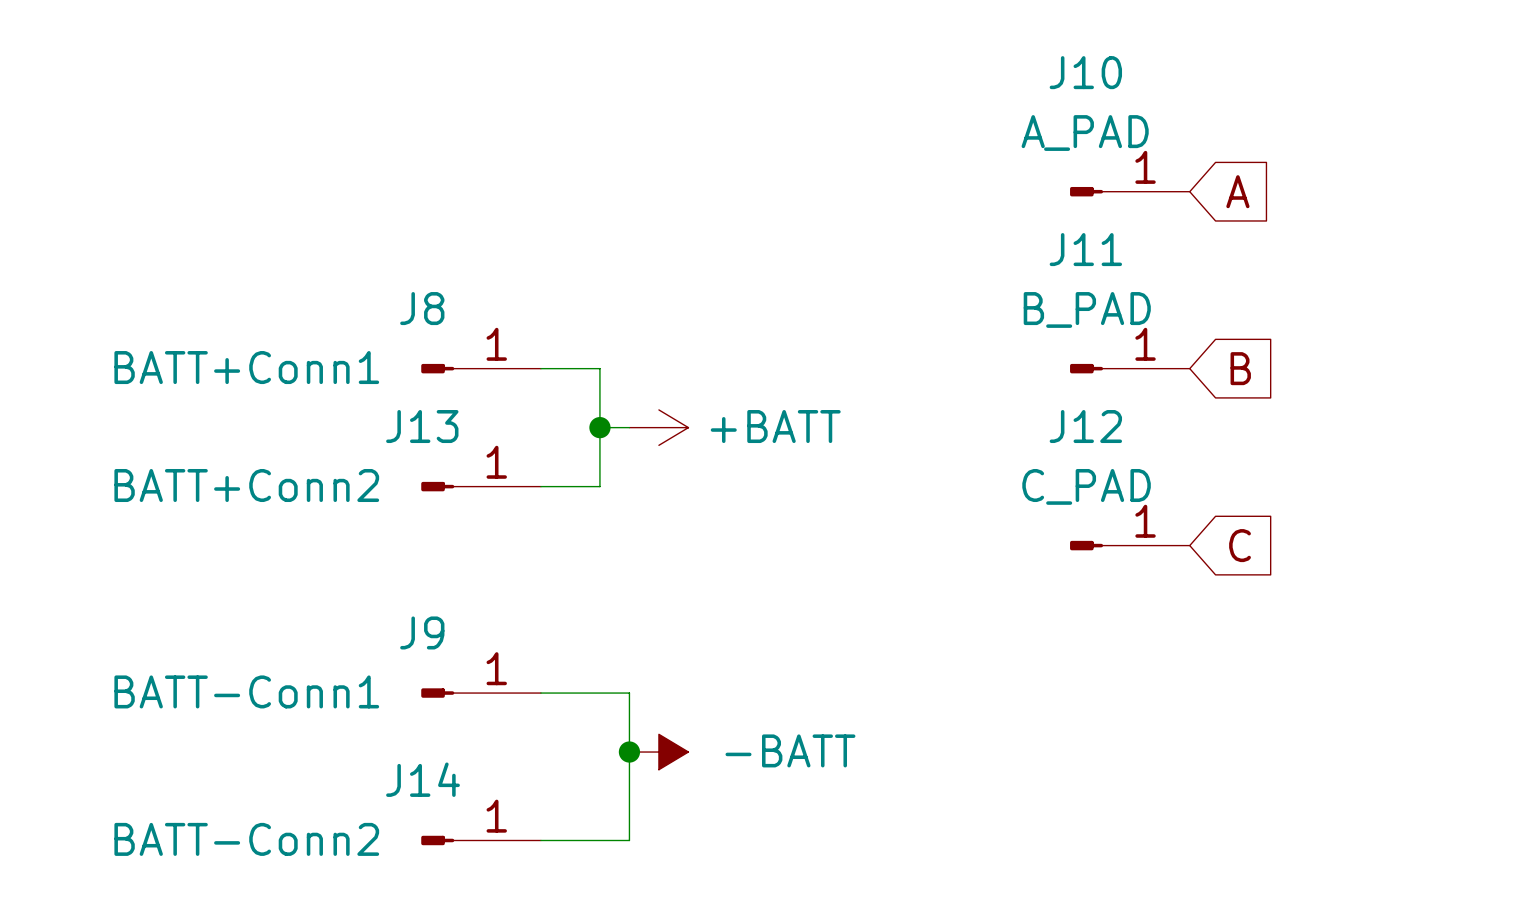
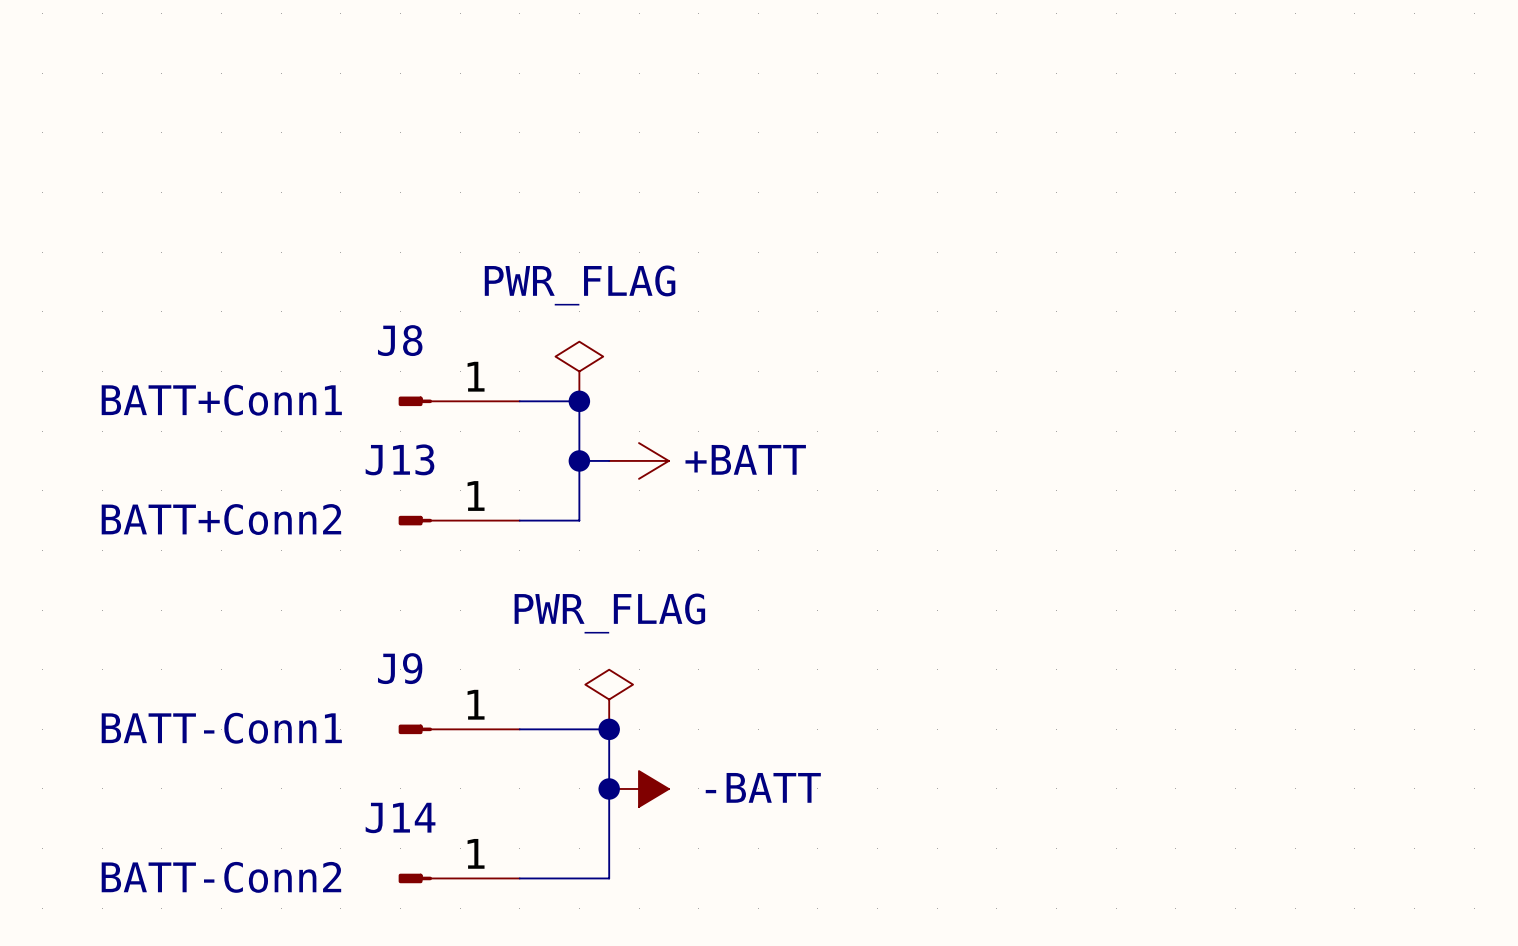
J10: A_PAD (1129, 191) -> none
global label: A (1237, 191) -> none
power symbol: none -> PWR_FLAG (579, 371)
junction: none -> (579, 401)
J11: B_PAD (1129, 368) -> none
global label: B (1240, 368) -> none
J12: C_PAD (1129, 545) -> none
global label: C (1240, 545) -> none
power symbol: none -> PWR_FLAG (609, 699)
junction: none -> (609, 729)

